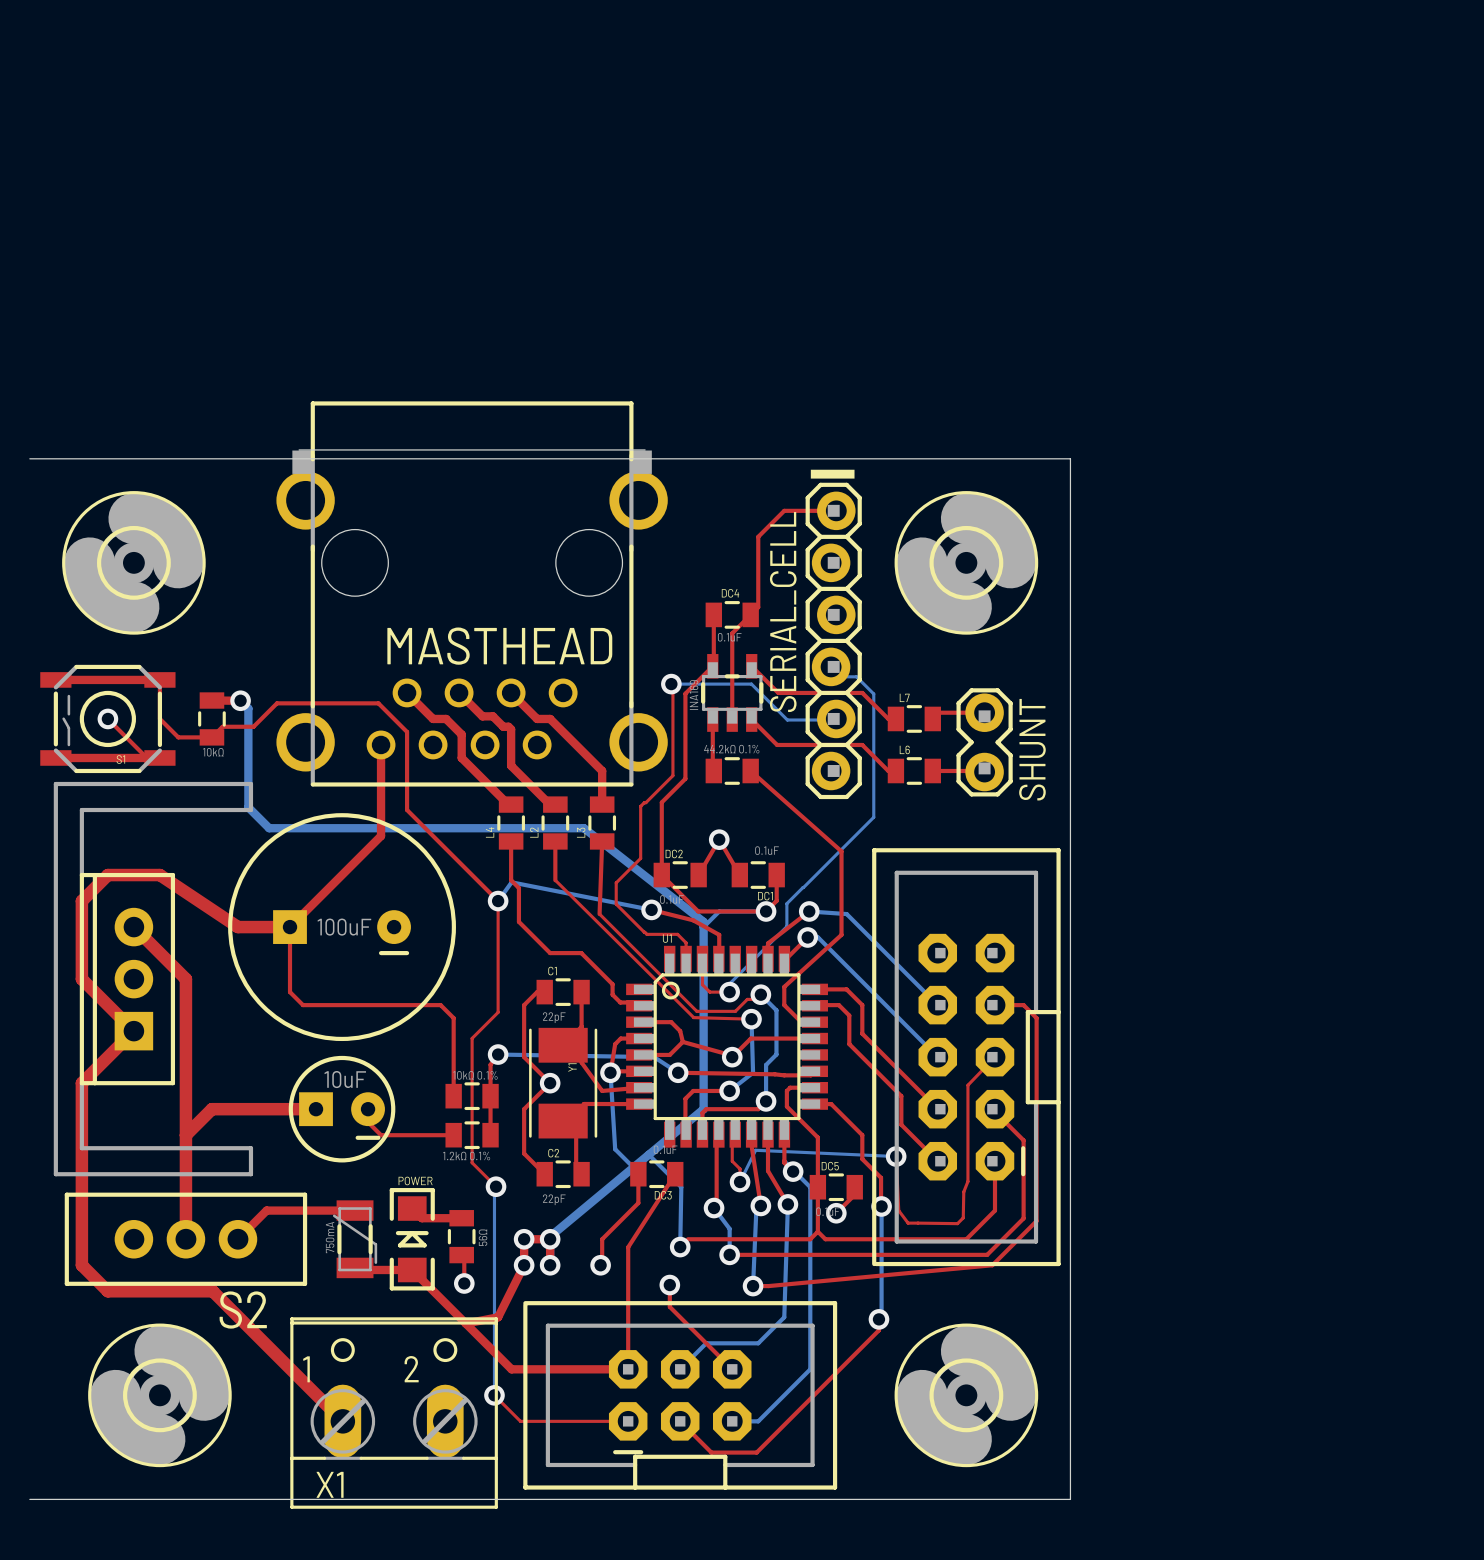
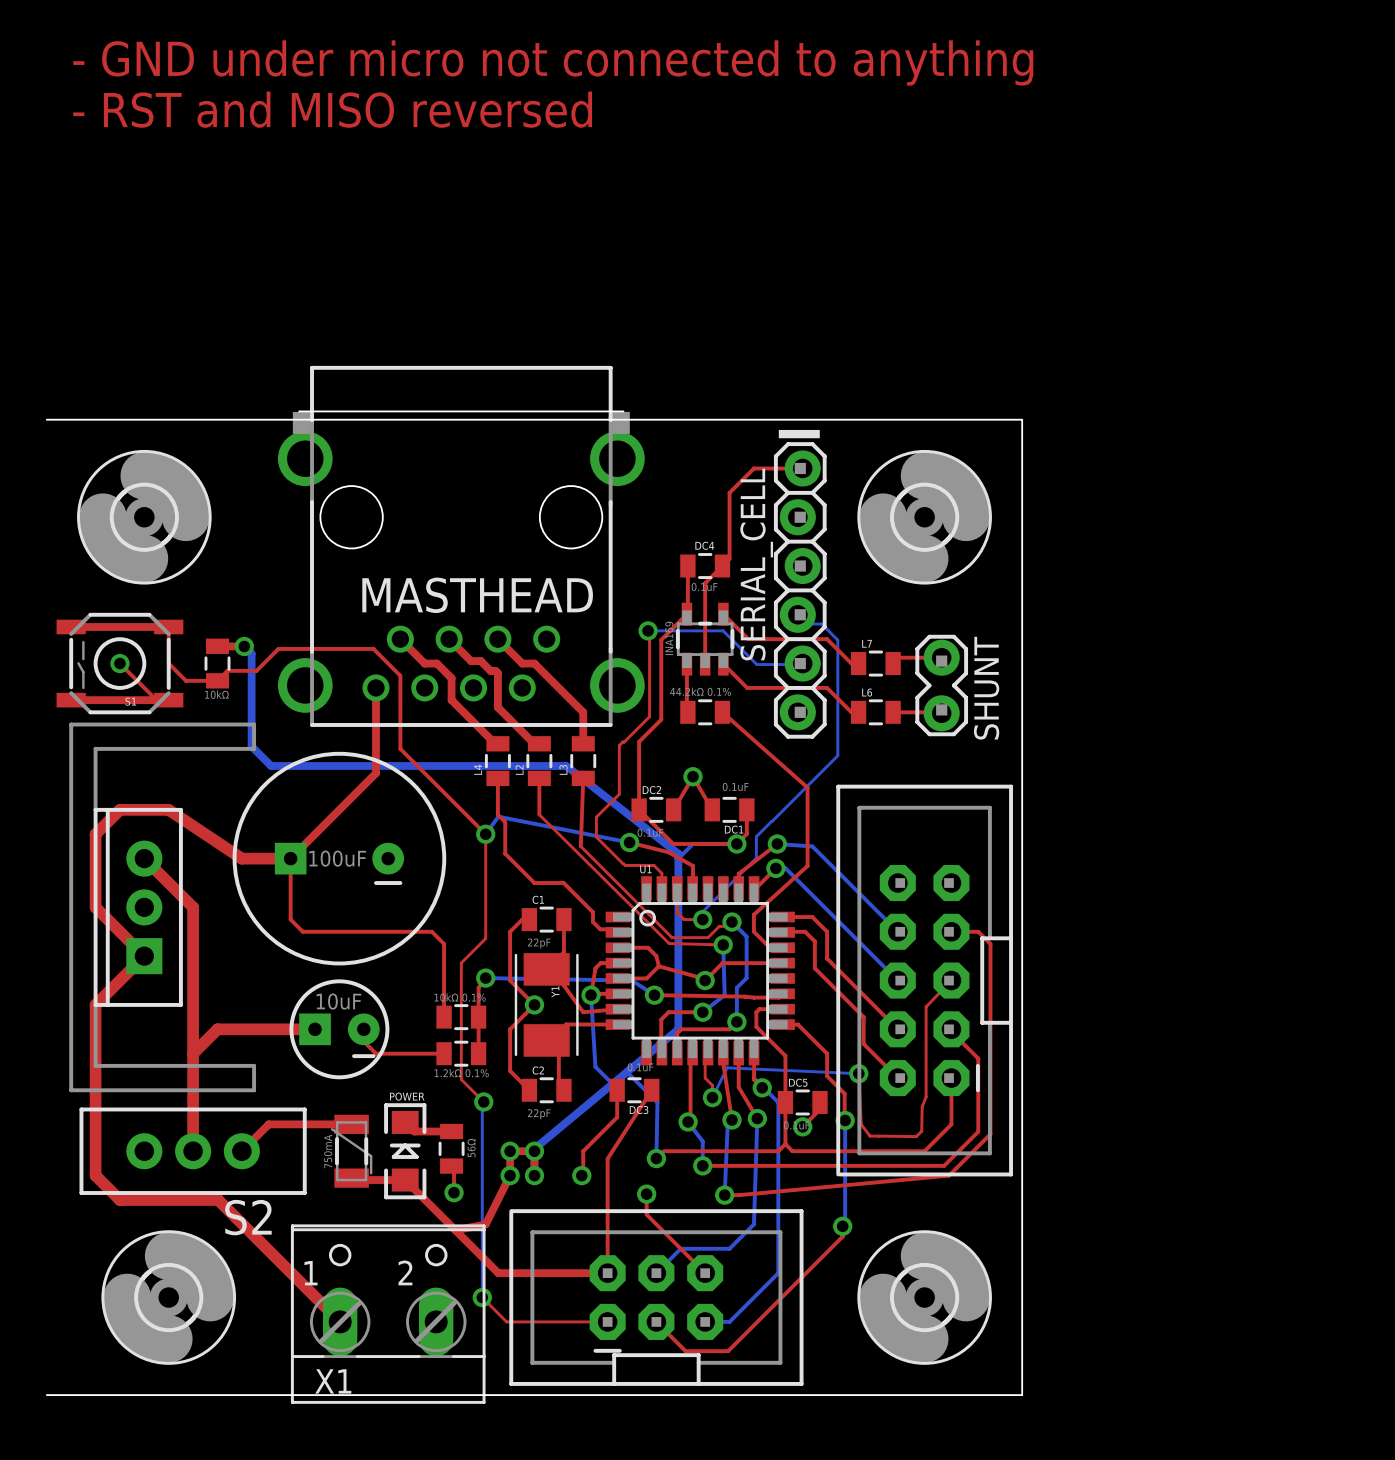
text: none -> - GND under micro not connected to anything (553, 62)
text: none -> - RST and MISO reversed (332, 109)

